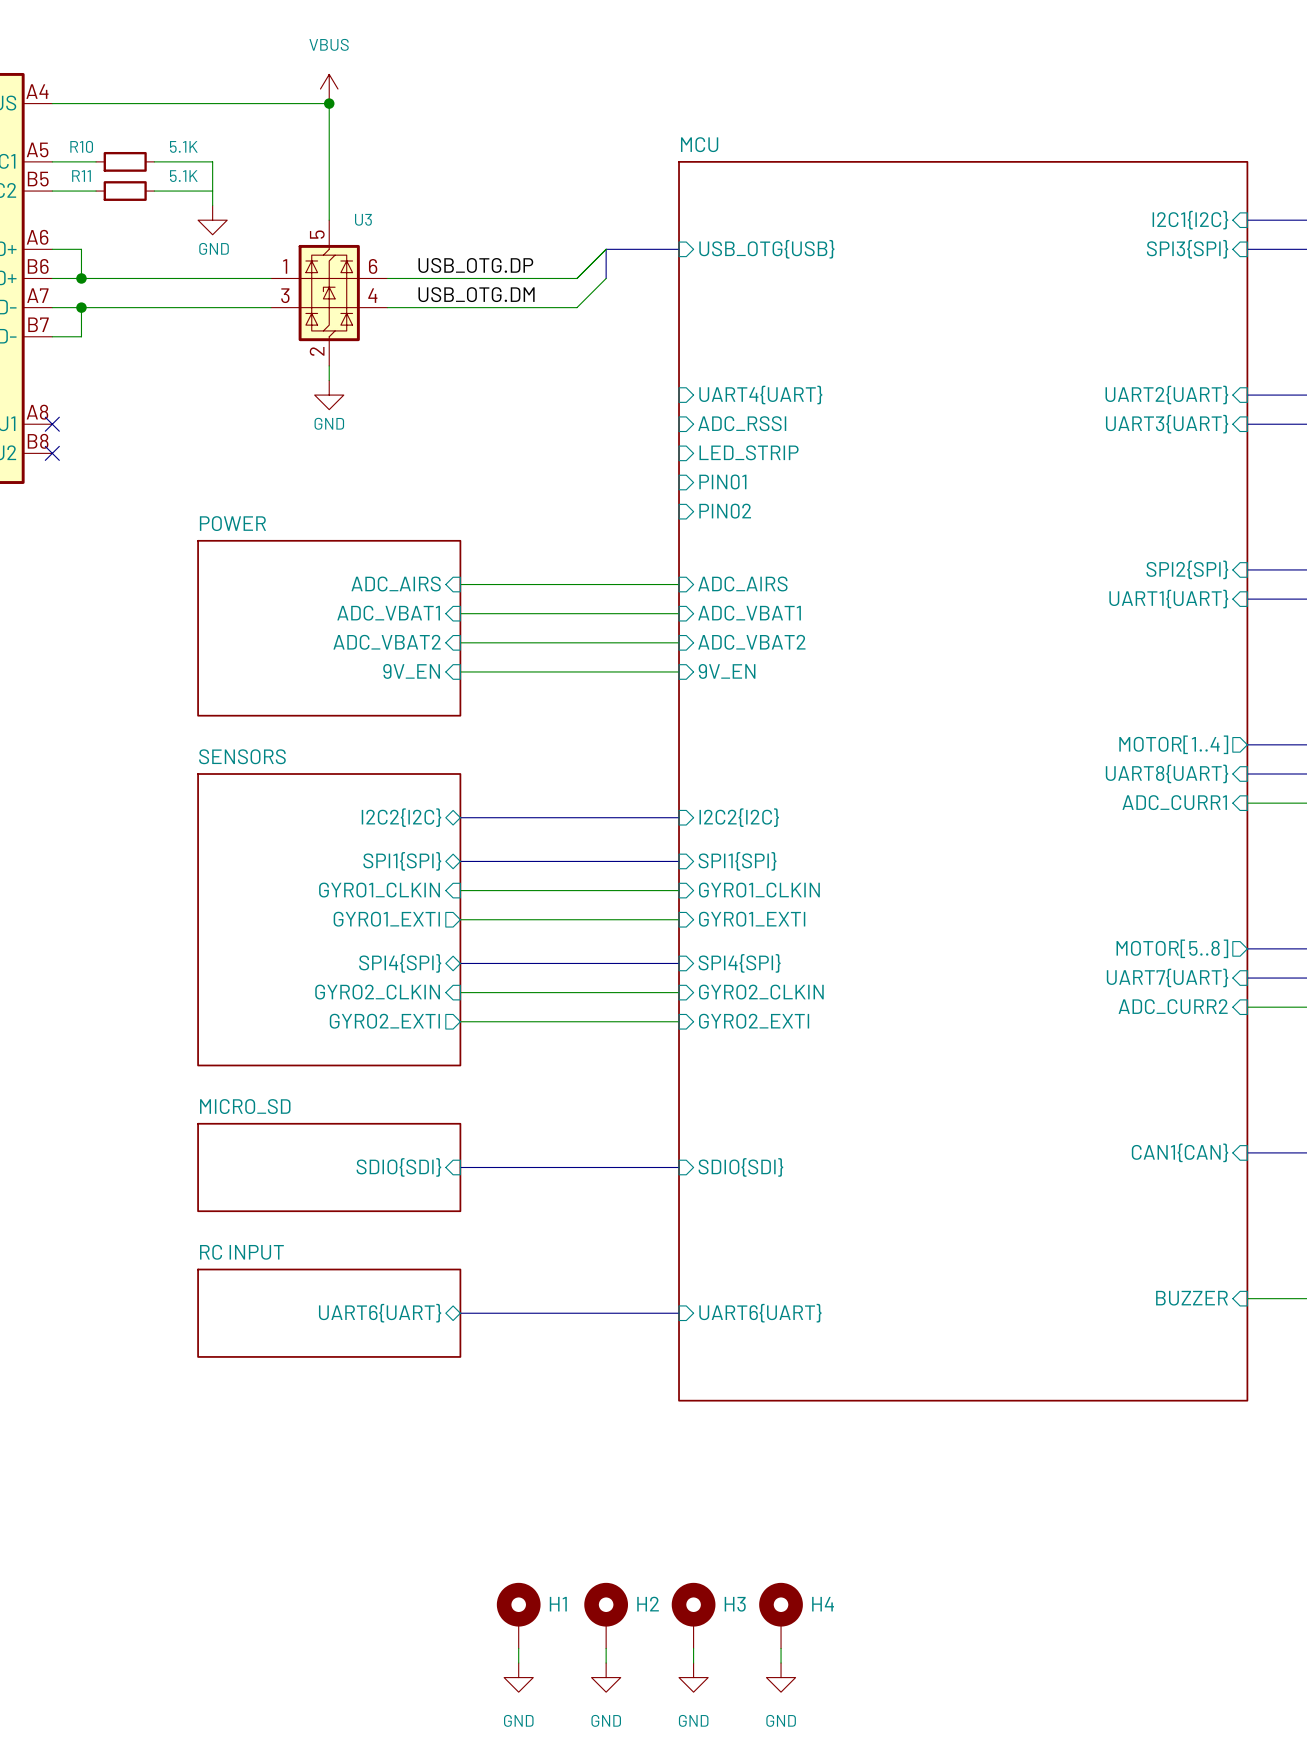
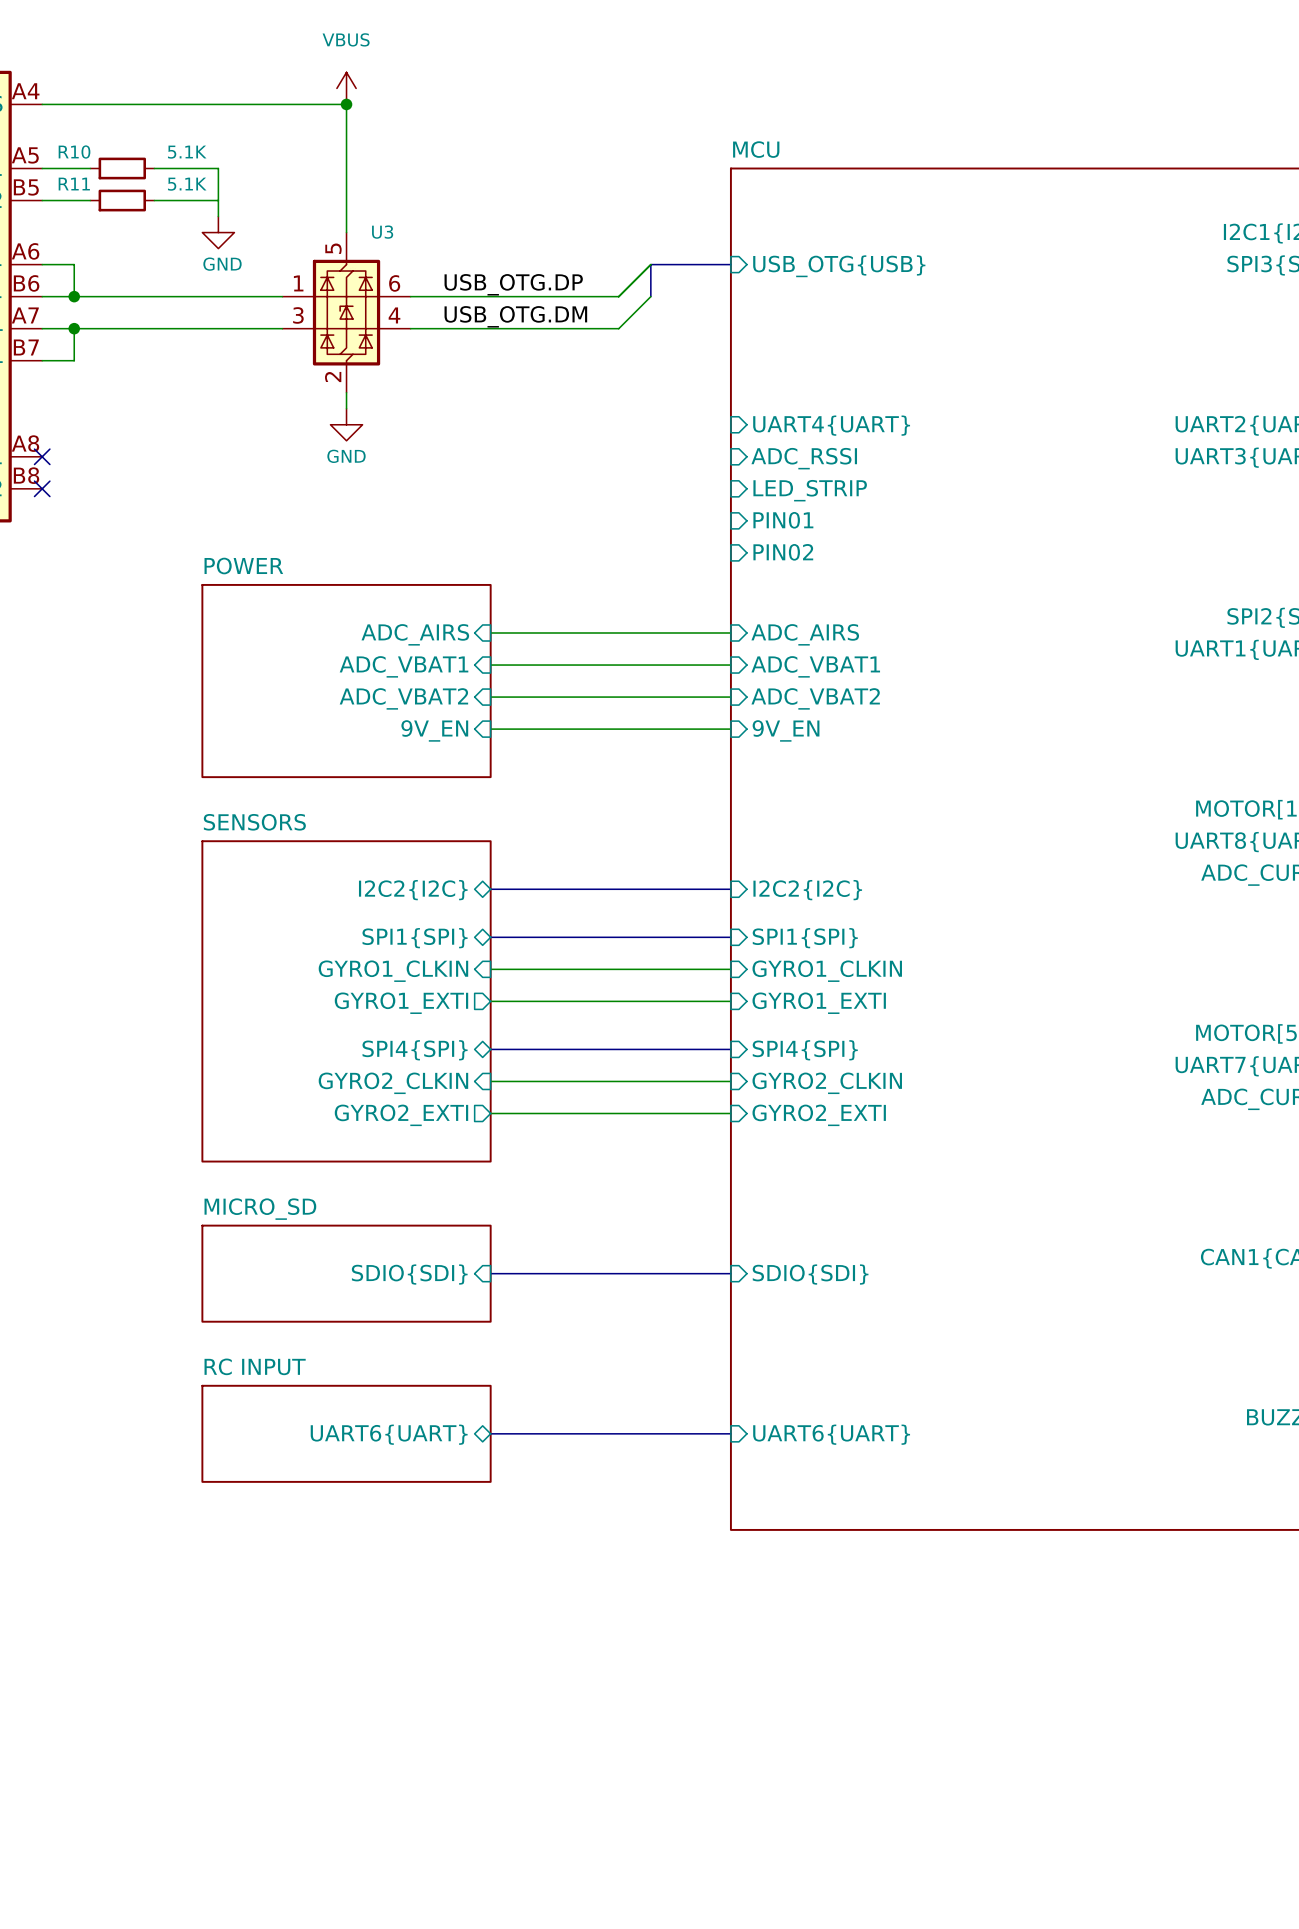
H1: (518, 1615) -> none
H2: (606, 1615) -> none
H3: (693, 1615) -> none
H4: (781, 1615) -> none
wire: (518, 1648) (518, 1663) -> none
wire: (606, 1648) (606, 1663) -> none
wire: (693, 1648) (693, 1663) -> none
wire: (781, 1648) (781, 1663) -> none
power symbol: GND (518, 1677) -> none
power symbol: GND (606, 1677) -> none
power symbol: GND (693, 1677) -> none
power symbol: GND (781, 1677) -> none

